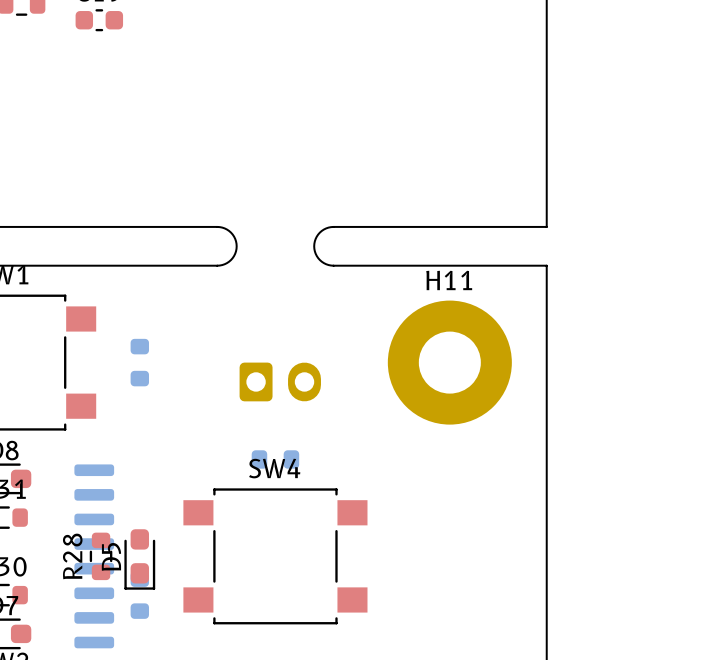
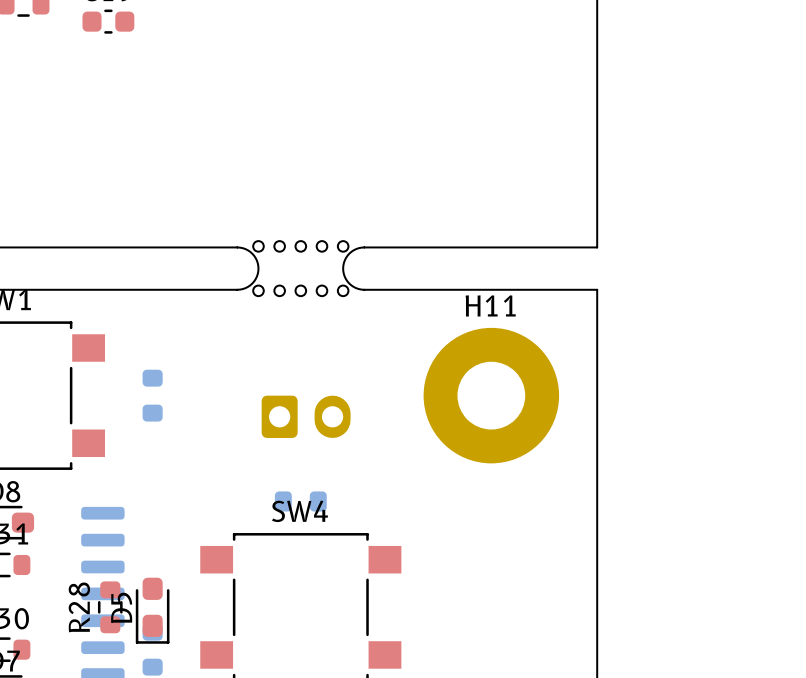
part: none -> (300, 268)

